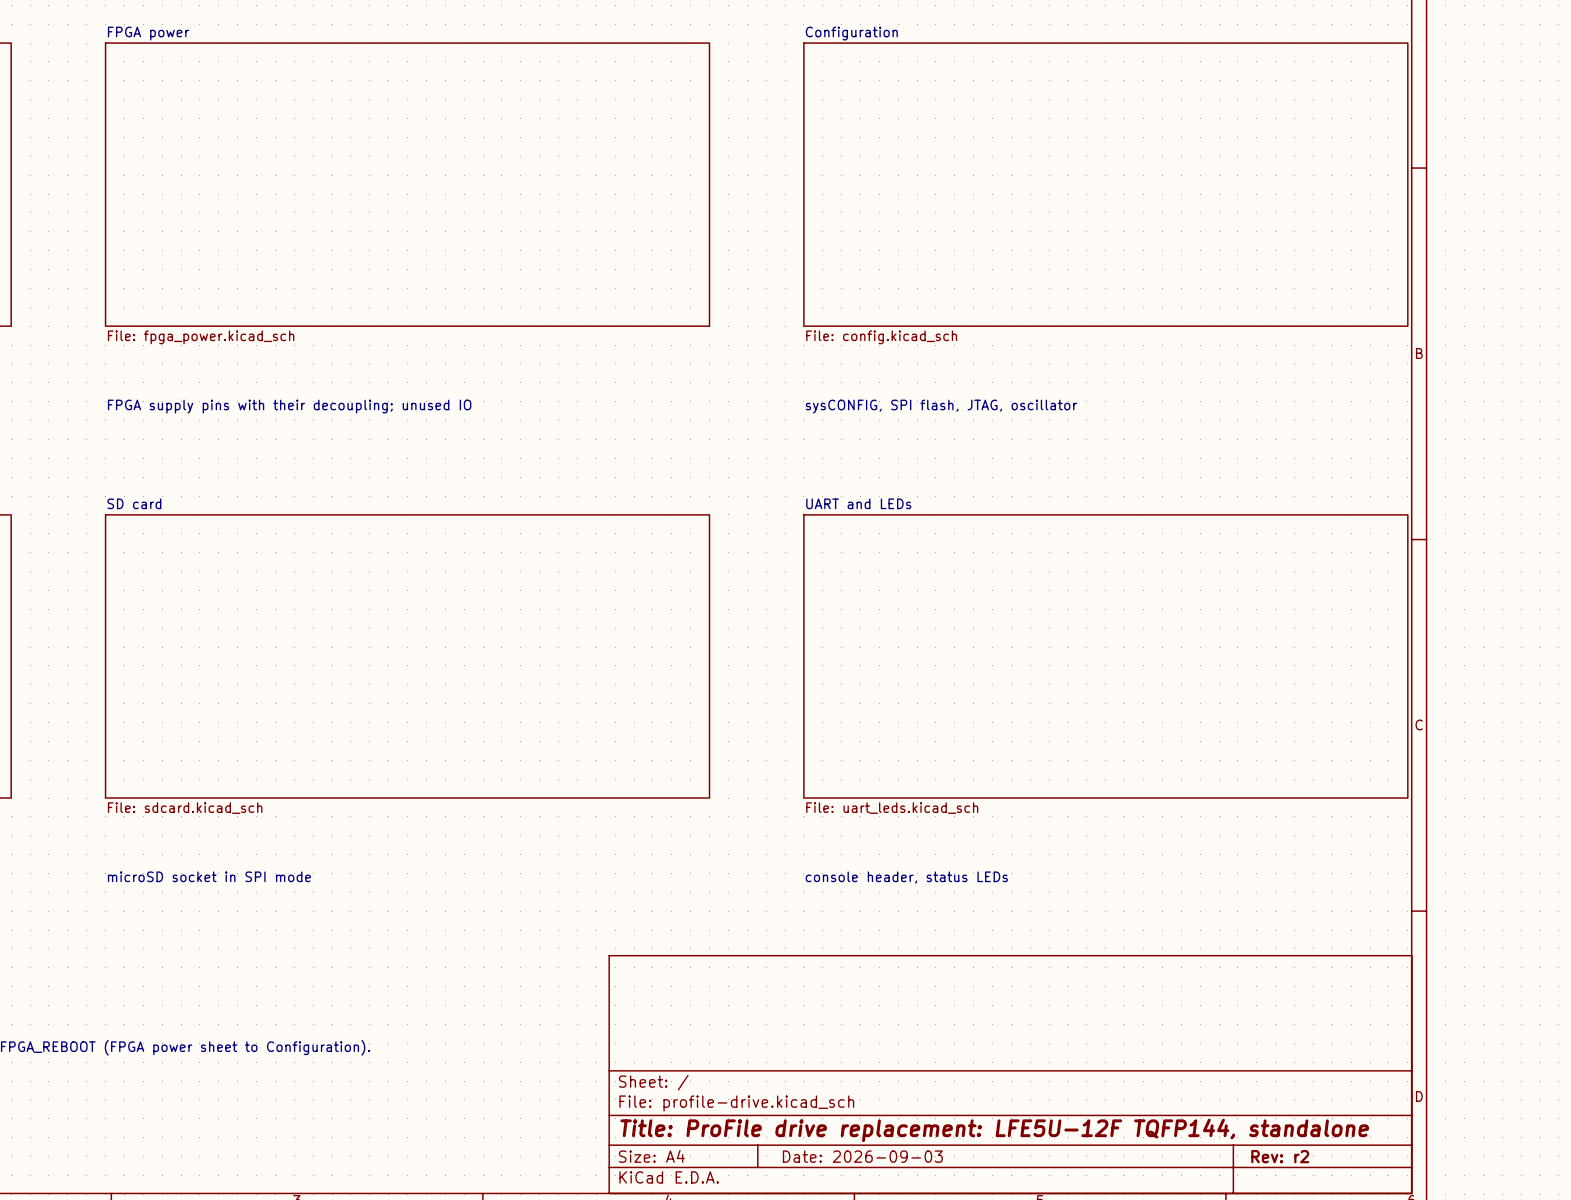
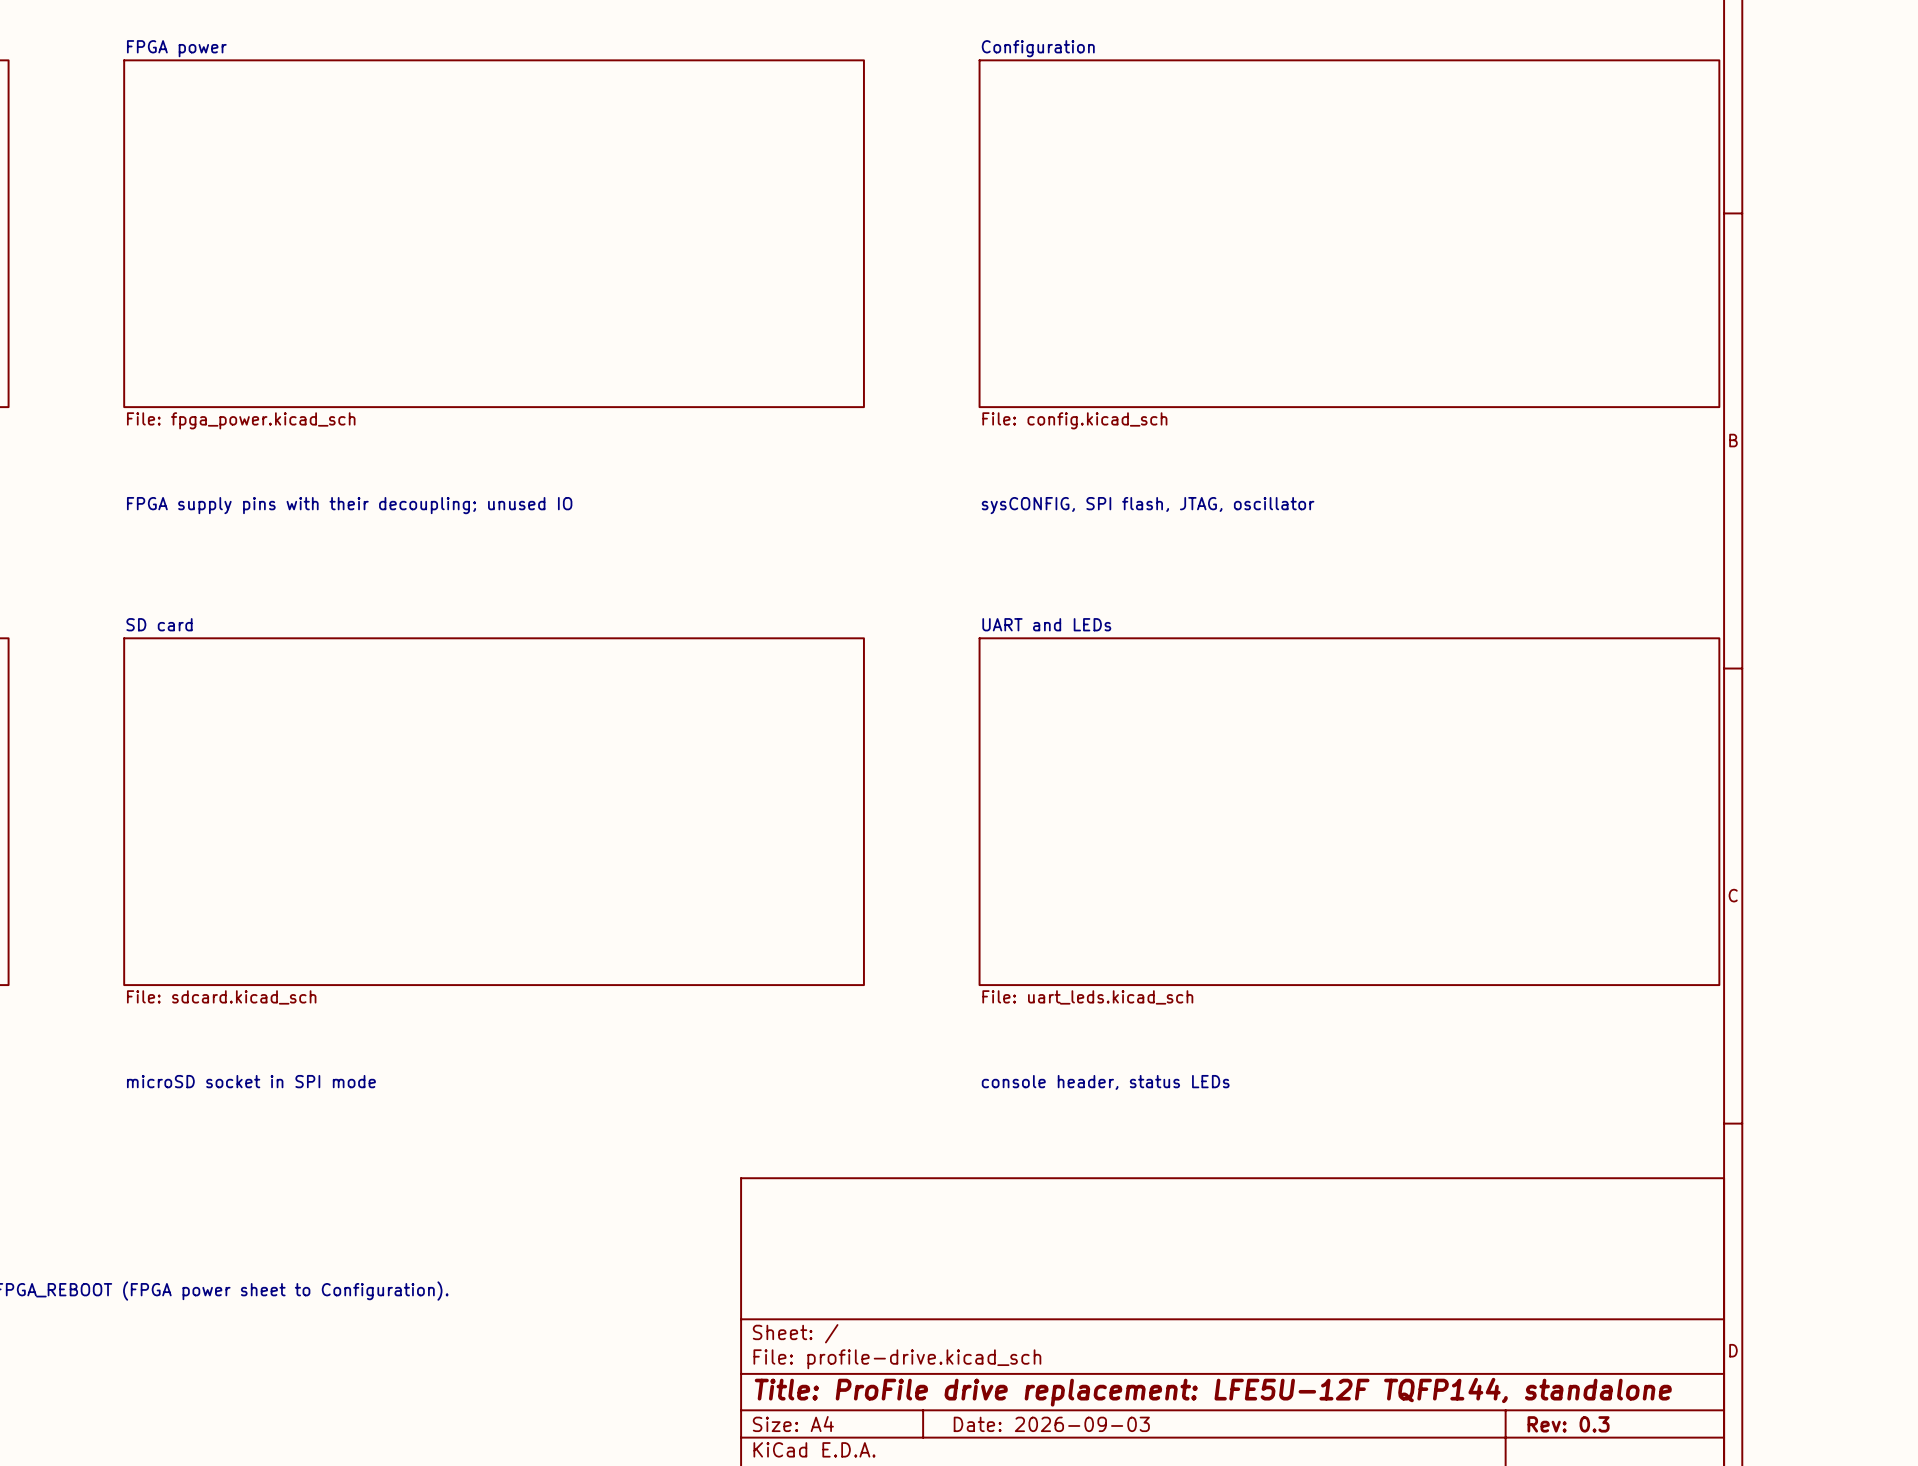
title block: Rev: r2 (1280, 1156) -> Rev: 0.3 (1568, 1424)

